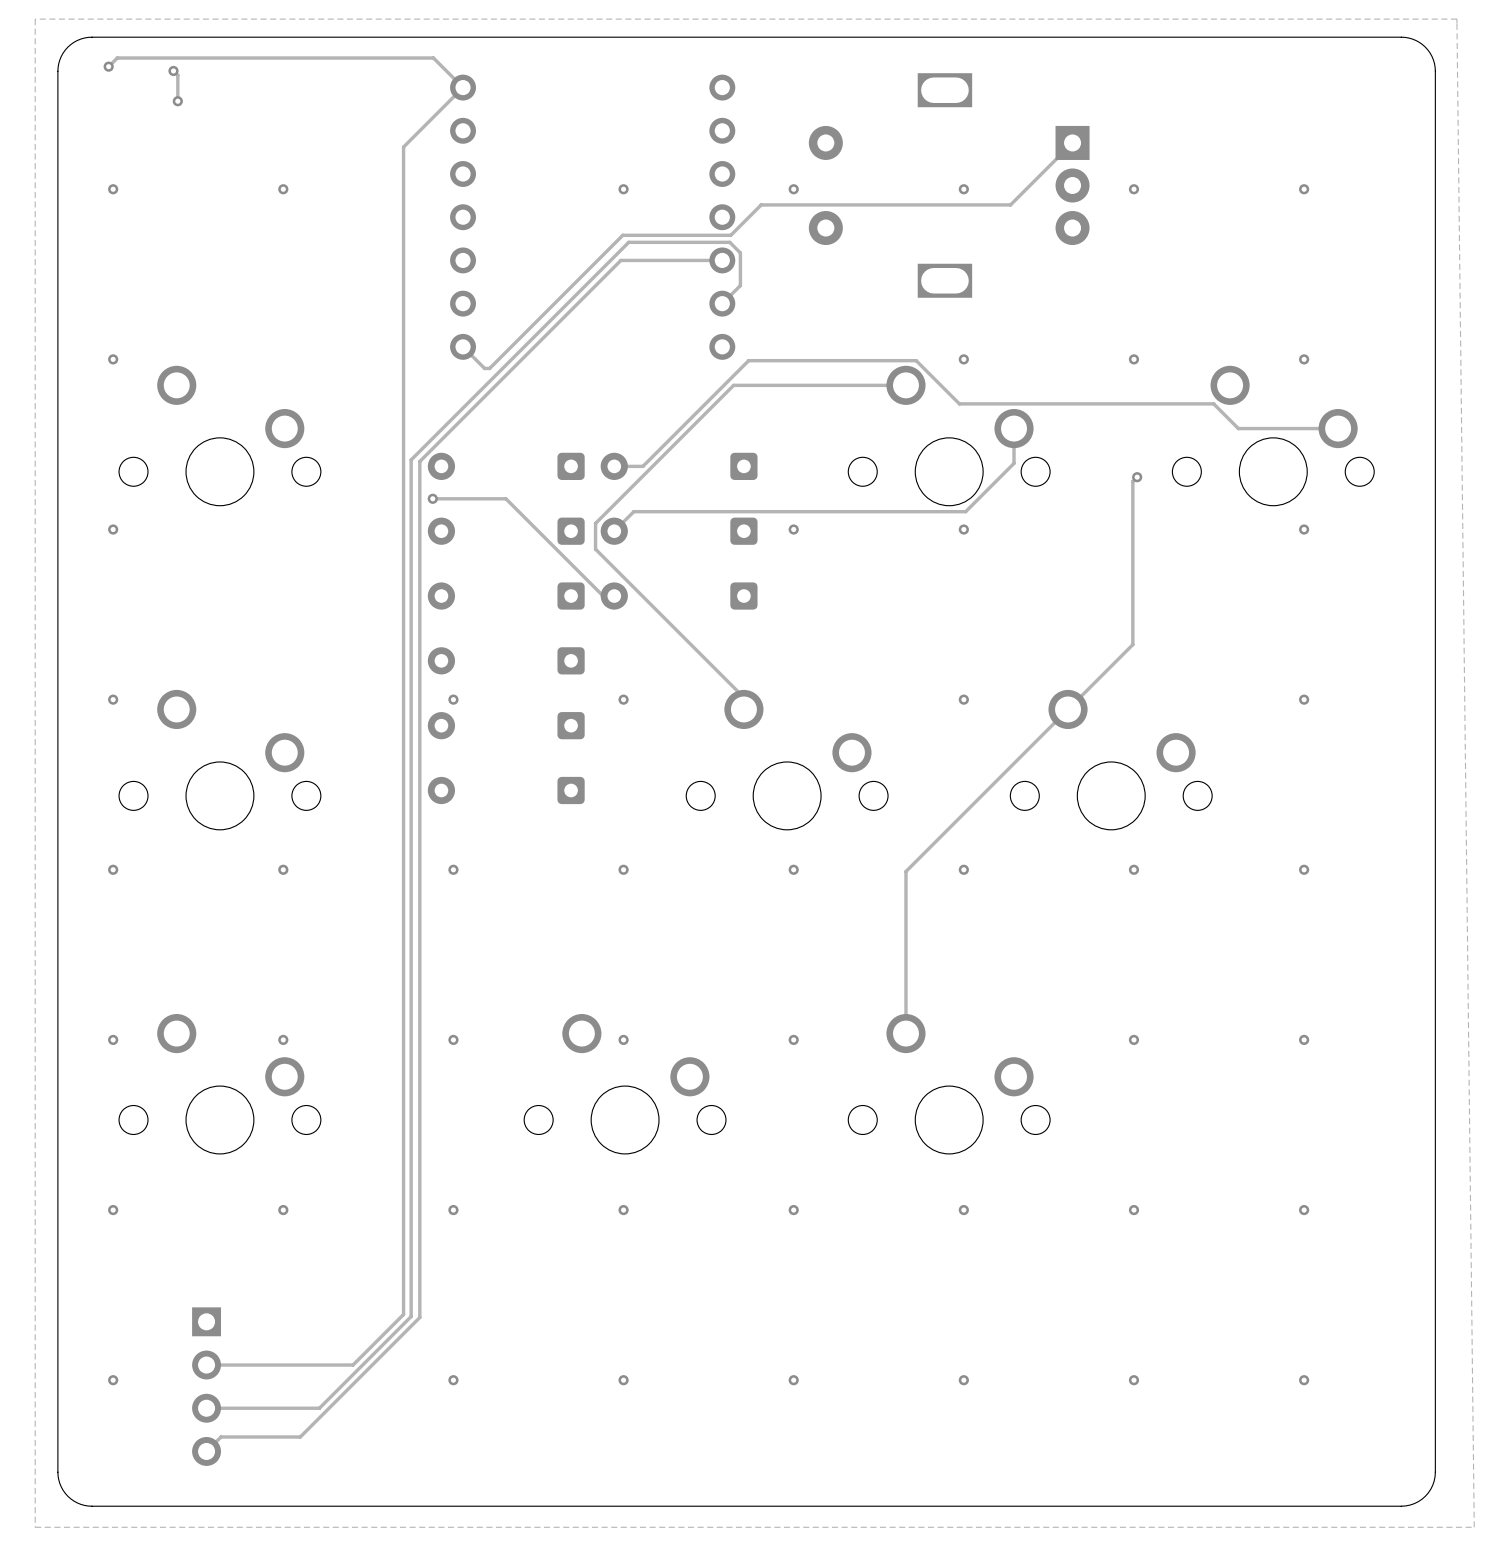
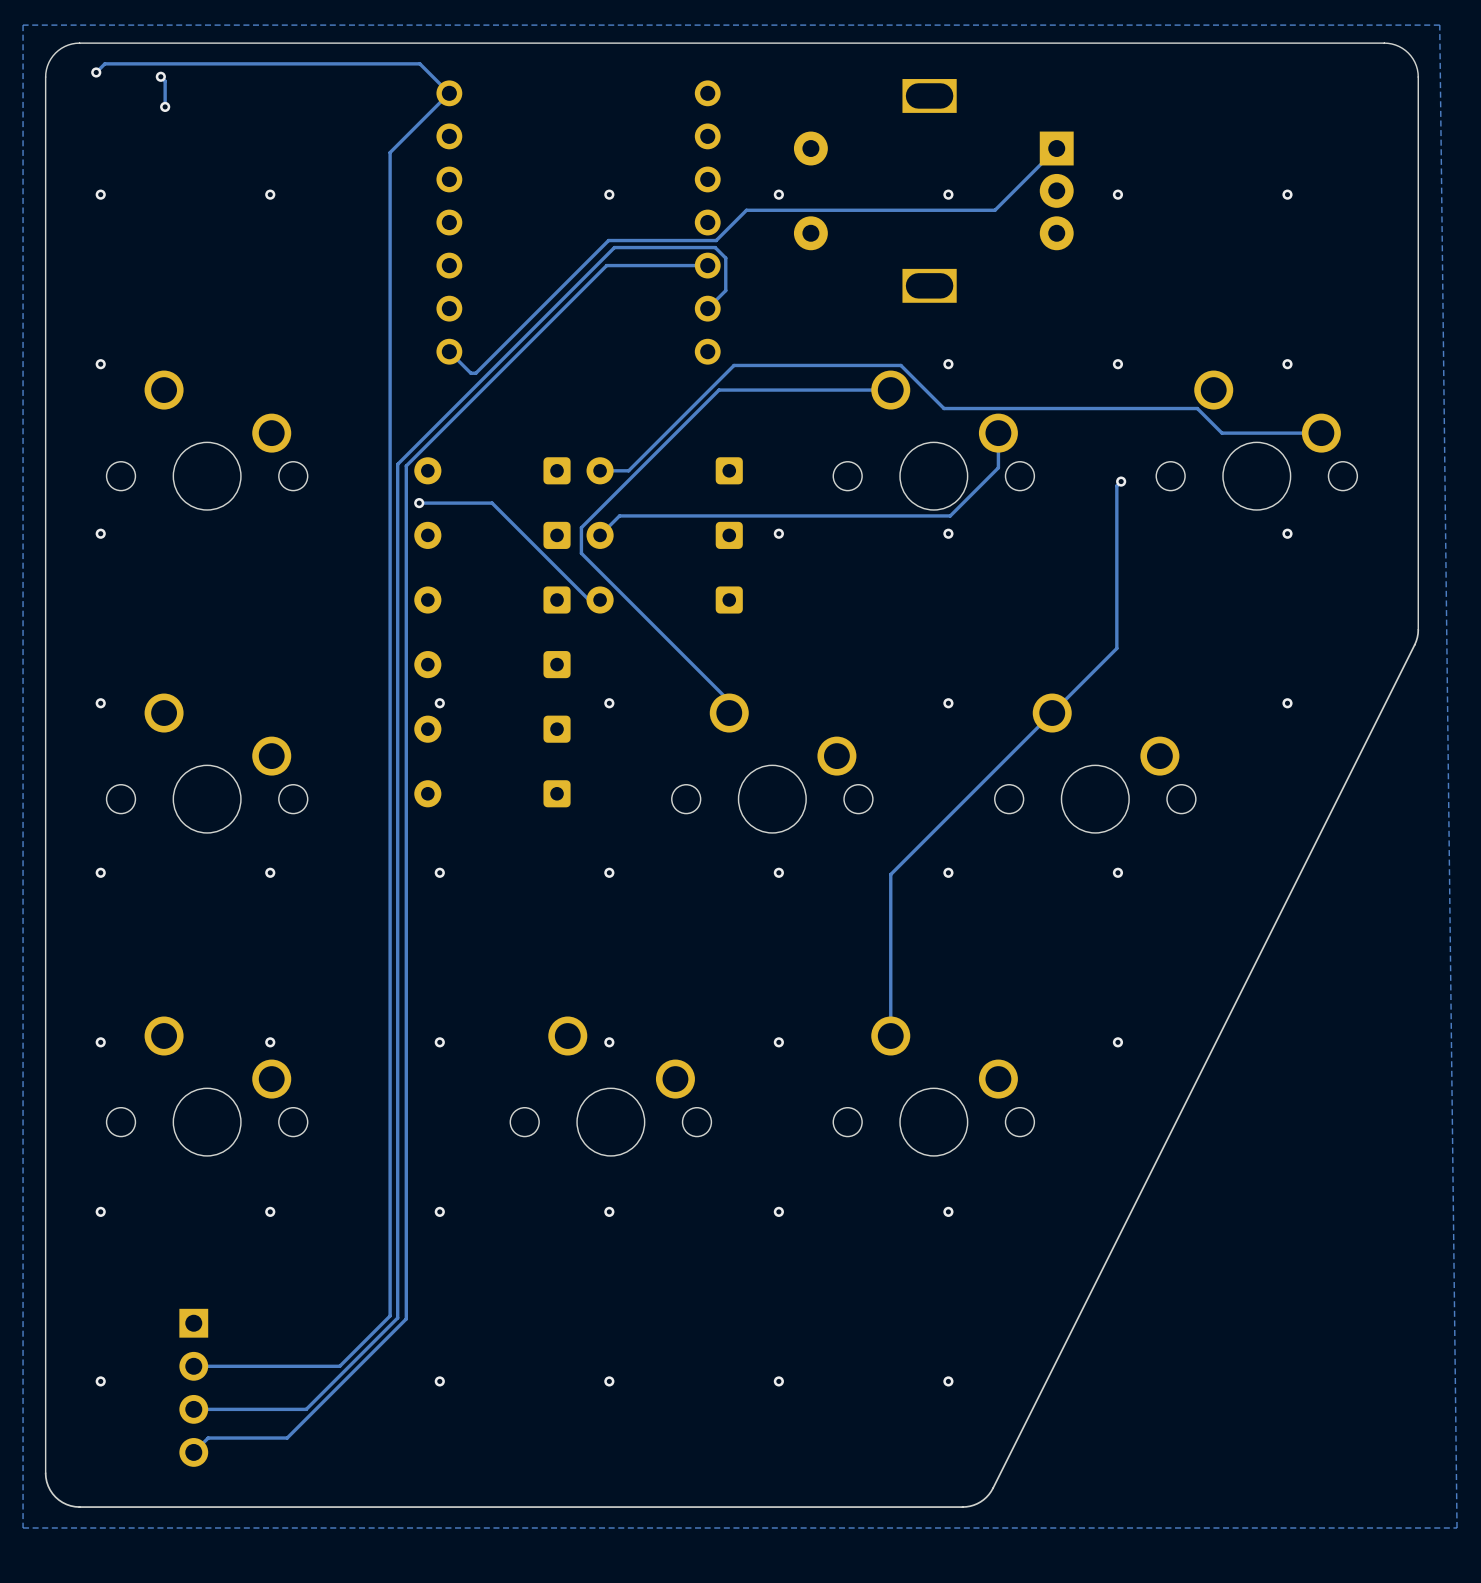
board edge: (1435, 625) (1435, 1472) (1430, 1489) (1418, 1501) (1401, 1506) (91, 1506) (77, 1502) (67, 1496) (59, 1483) (57, 1472) -> (1418, 629) (1414, 644) (992, 1488) (980, 1501) (962, 1507) (79, 1507) (66, 1504) (55, 1497) (48, 1486) (45, 1473)
via: (1304, 869) -> none
via: (1304, 1039) -> none
via: (1133, 1210) -> none
via: (1304, 1210) -> none
via: (1133, 1380) -> none
via: (1304, 1380) -> none

